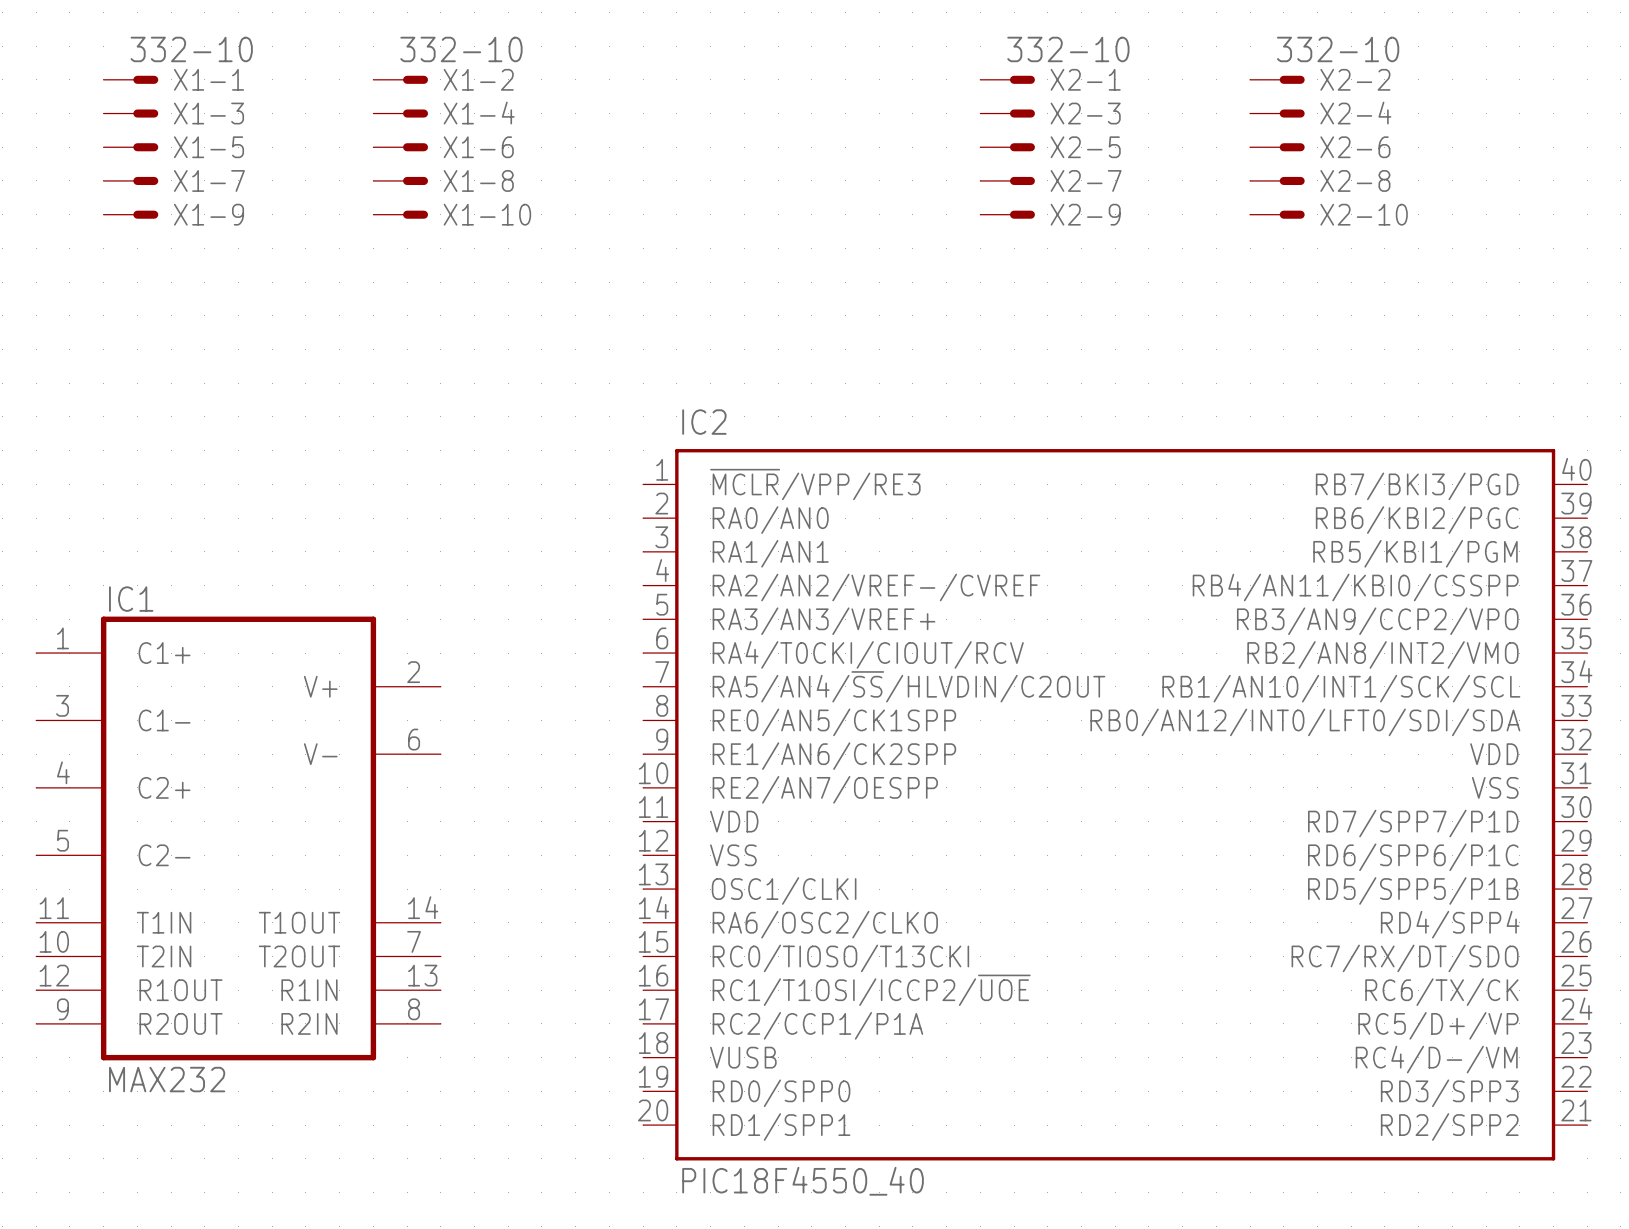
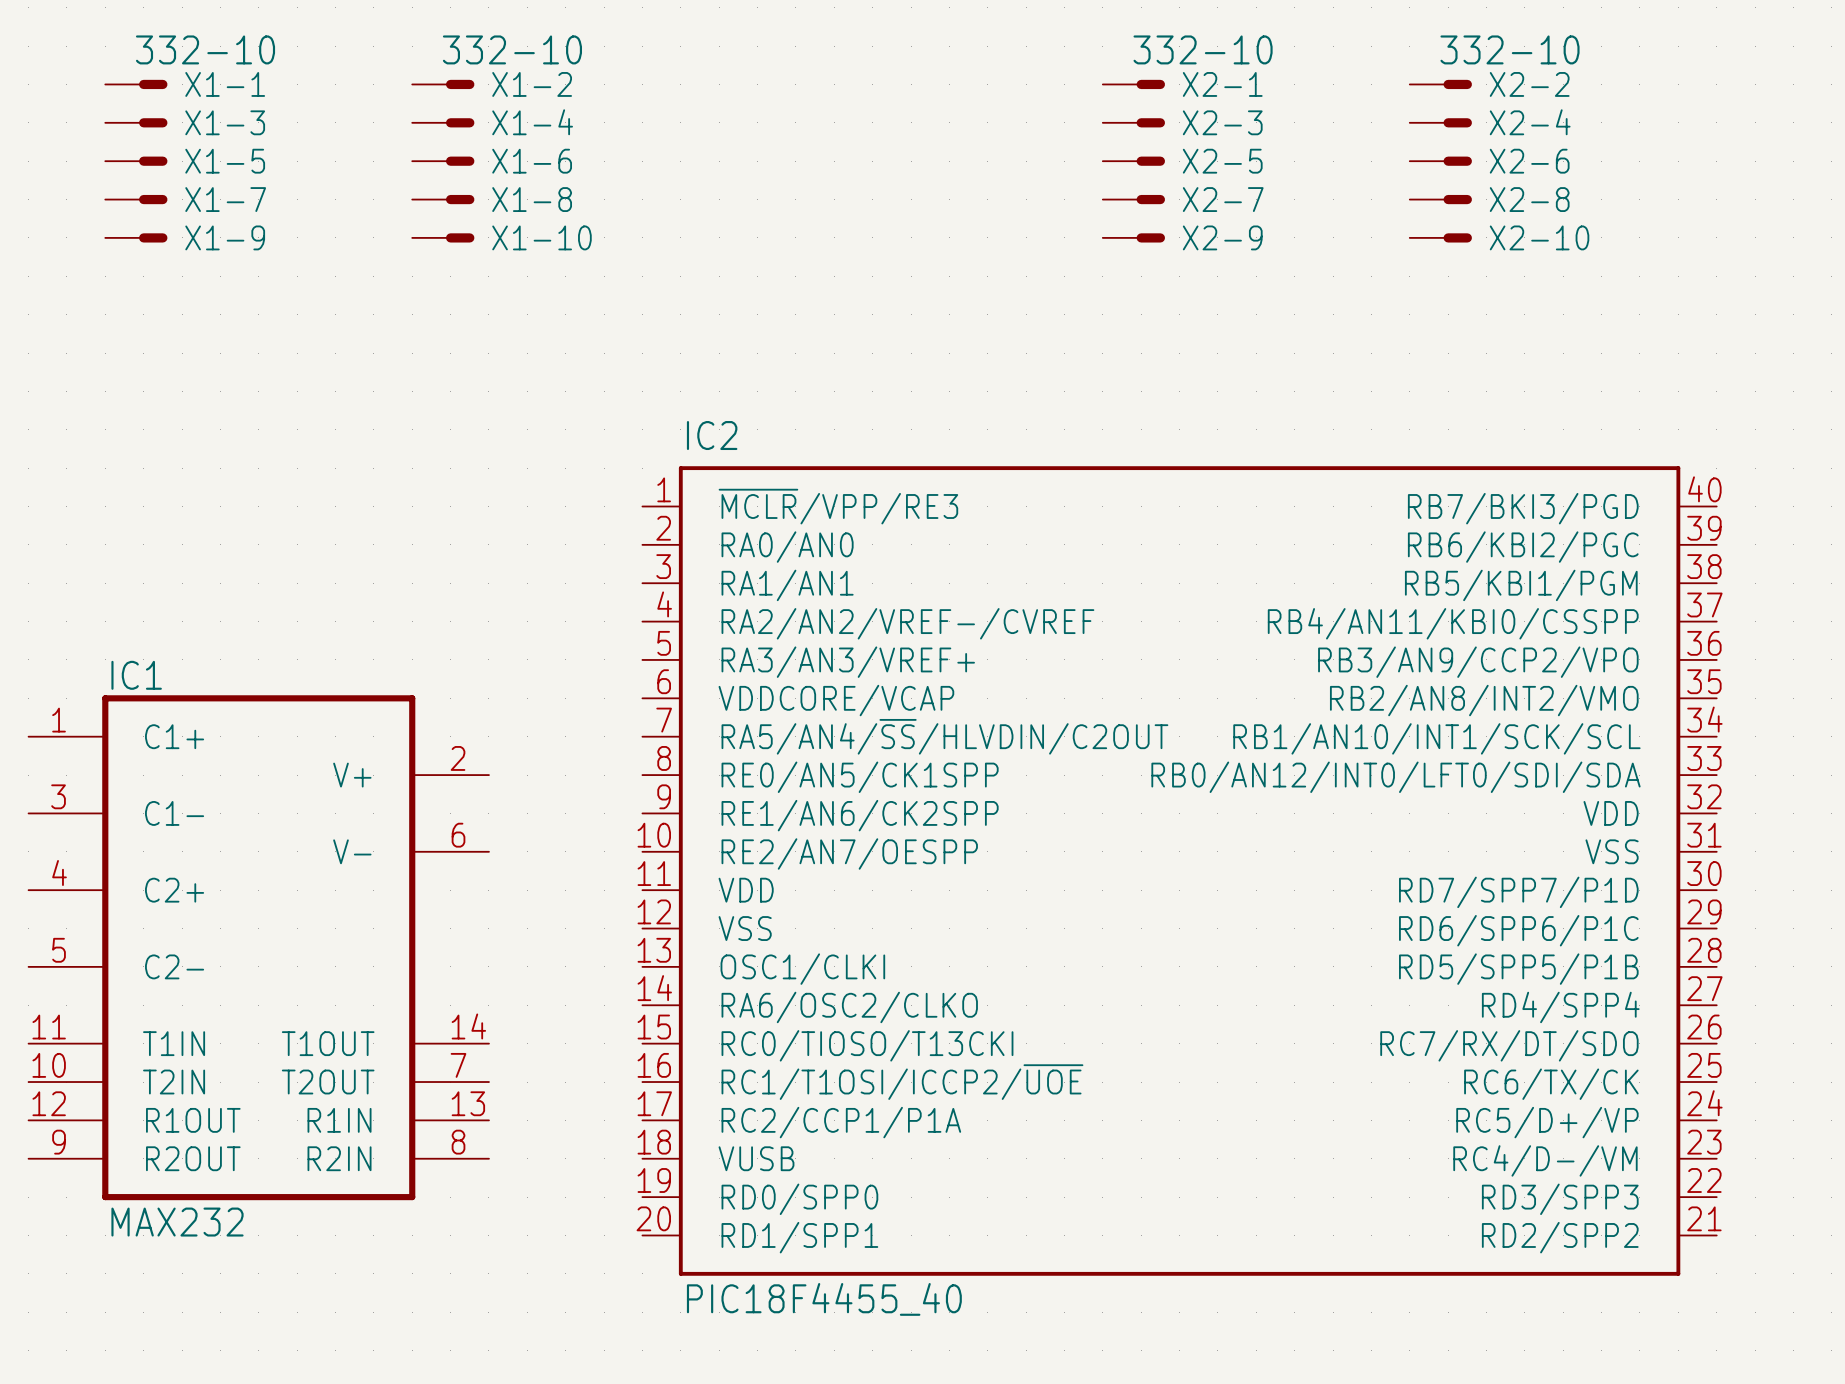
IC2 pin name: RA4/T0CKI/CIOUT/RCV (868, 654) -> VDDCORE/VCAP (836, 700)
IC2 position: (1115, 804) -> (1179, 870)
IC2 value: PIC18F4550_40 (803, 1181) -> PIC18F4455_40 (824, 1299)

